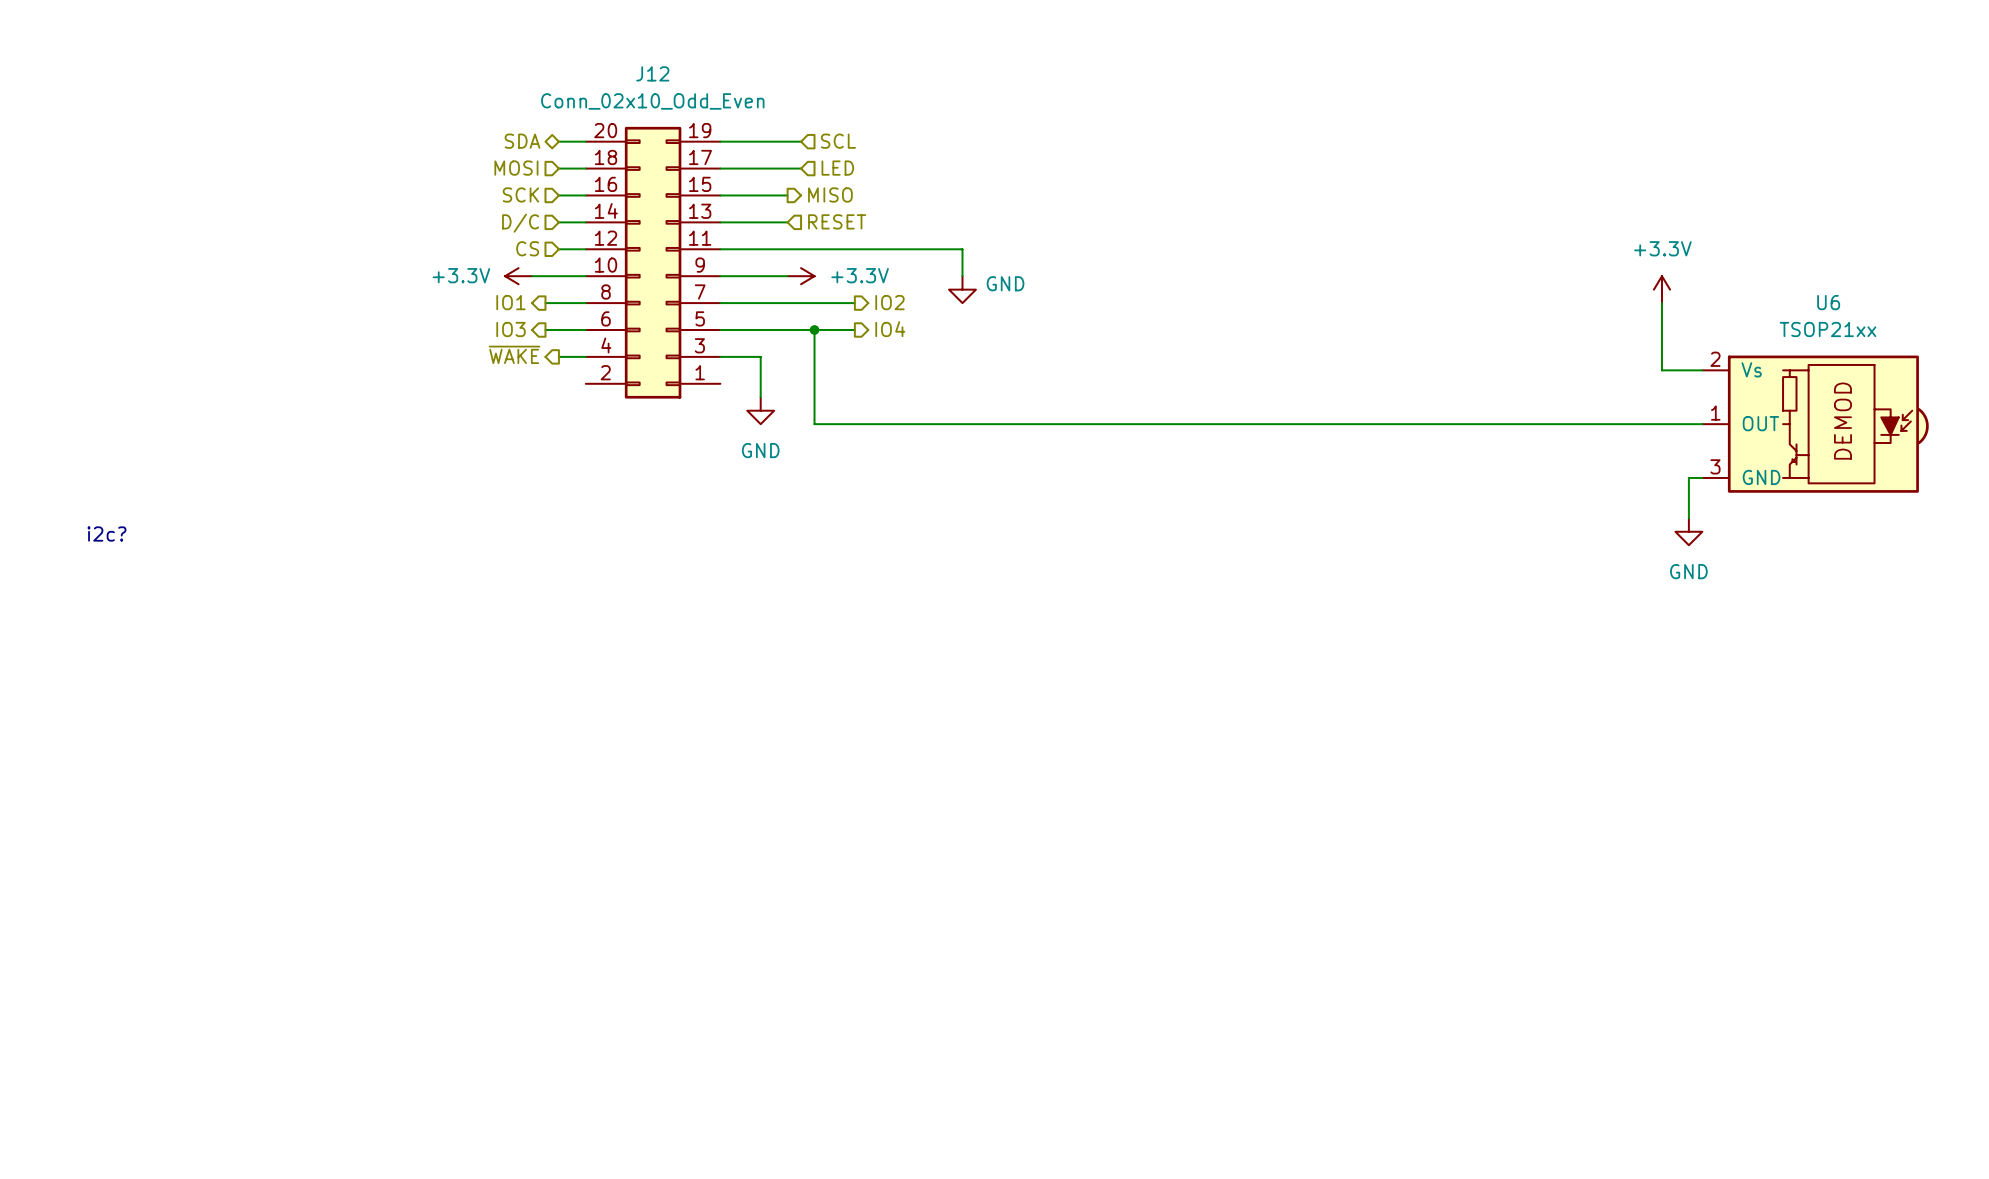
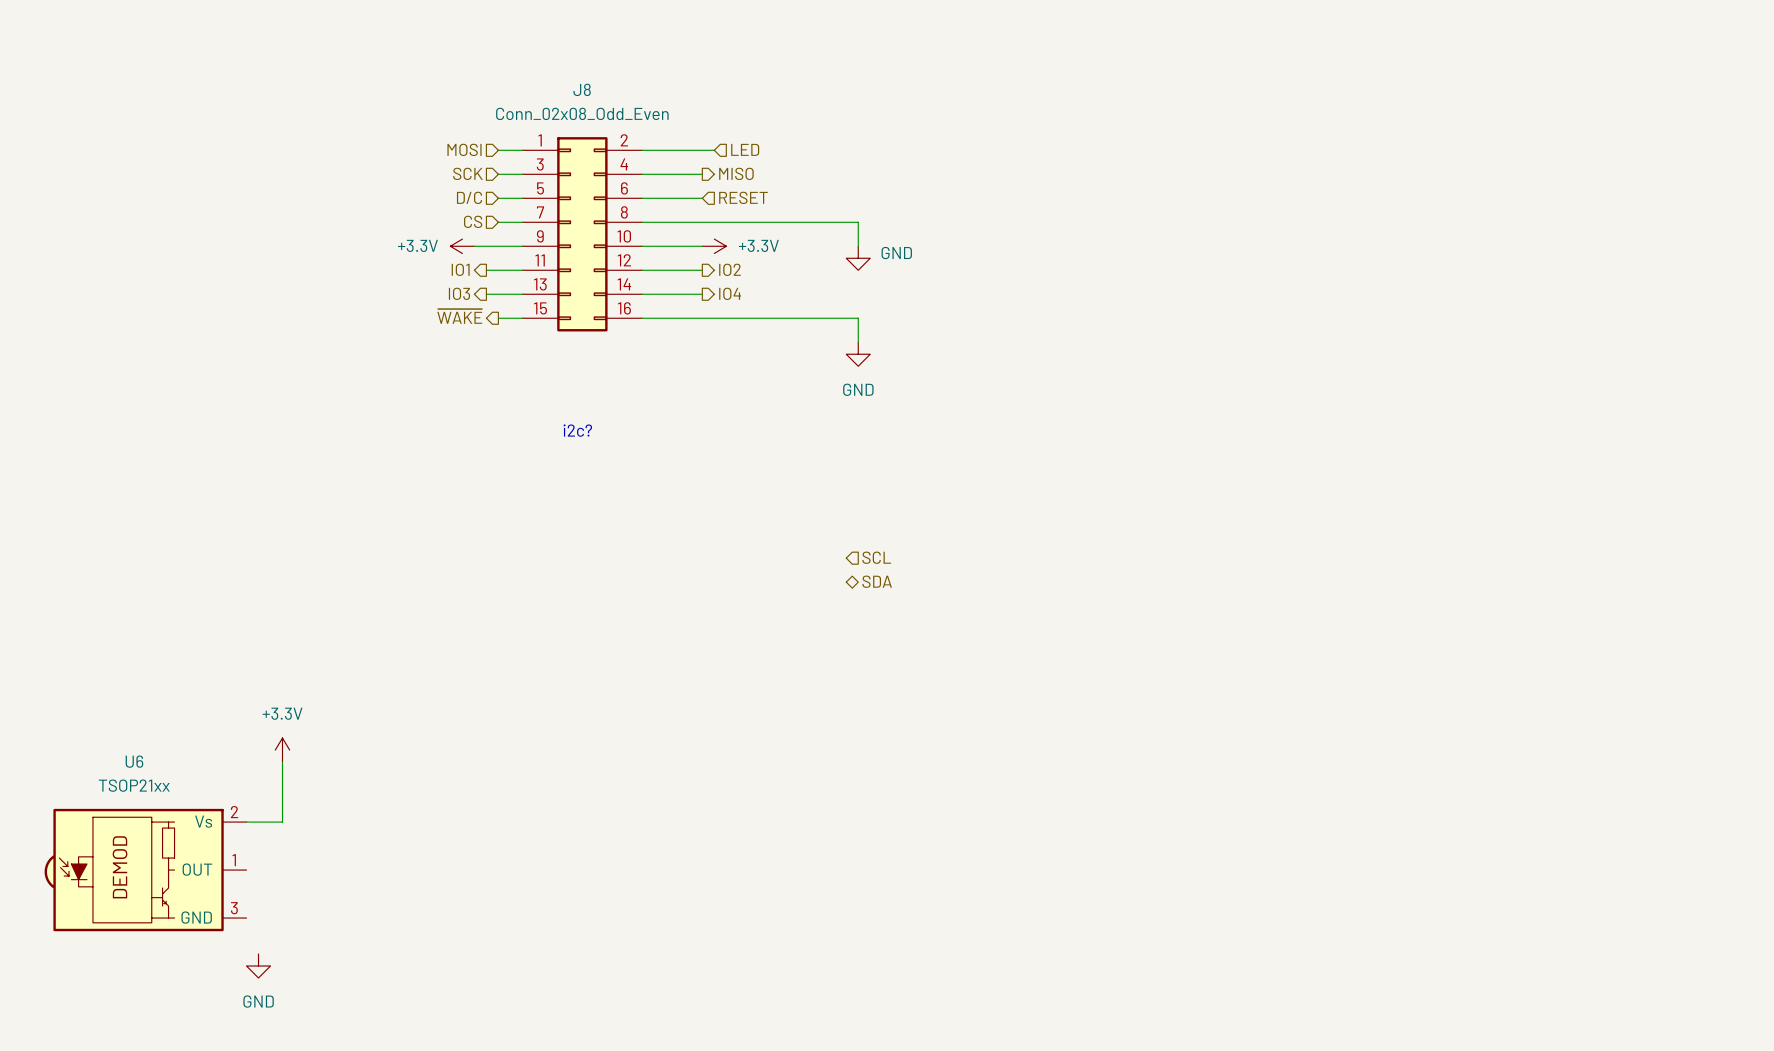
hierarchical label: SDA (522, 141) -> none
wire: (558, 141) (585, 141) -> none
wire: (720, 141) (801, 141) -> none
hierarchical label: SCL (838, 141) -> none
J12: Conn_02x10_Odd_Even (653, 262) -> none
J8: none -> Conn_02x08_Odd_Even (582, 234)
power symbol: +3.3V (1661, 289) -> none
hierarchical label position: IO2 (889, 302) -> IO2 (730, 269)
wire: (787, 303) (854, 303) -> none
wire: (1661, 303) (1661, 370) (1702, 370) -> none
wire: (787, 329) (854, 329) -> none
wire: (814, 329) (814, 424) (1702, 424) -> none
junction: (814, 329) -> none
hierarchical label position: IO4 (890, 329) -> IO4 (730, 293)
wire: (760, 356) (760, 397) -> (678, 318) (858, 318) (858, 342)
power symbol position: GND (760, 410) -> GND (858, 354)
U6 position: (1815, 424) -> (145, 870)
U6 flip: as is (1828, 424) -> left-right (134, 870)
wire: (1702, 477) (1688, 477) (1688, 518) -> none
text: none -> i2c? (577, 430)
power symbol: GND (1688, 531) -> none
text: i2c? (106, 534) -> none
hierarchical label: none -> SCL (876, 557)
hierarchical label: none -> SDA (877, 581)
power symbol: none -> +3.3V (282, 750)
wire: none -> (282, 762) (282, 822) (246, 822)
power symbol: none -> GND (258, 966)

